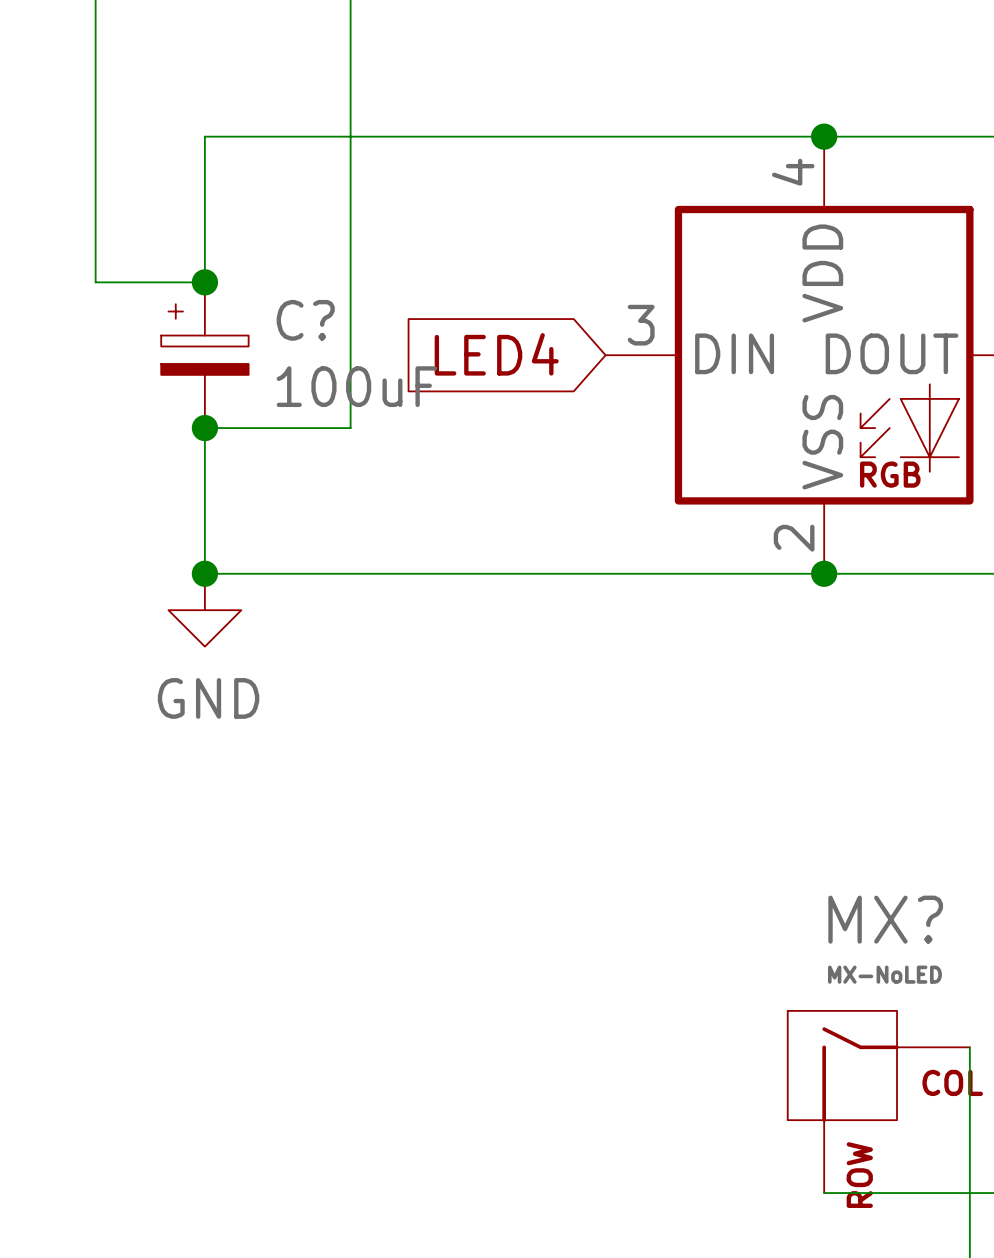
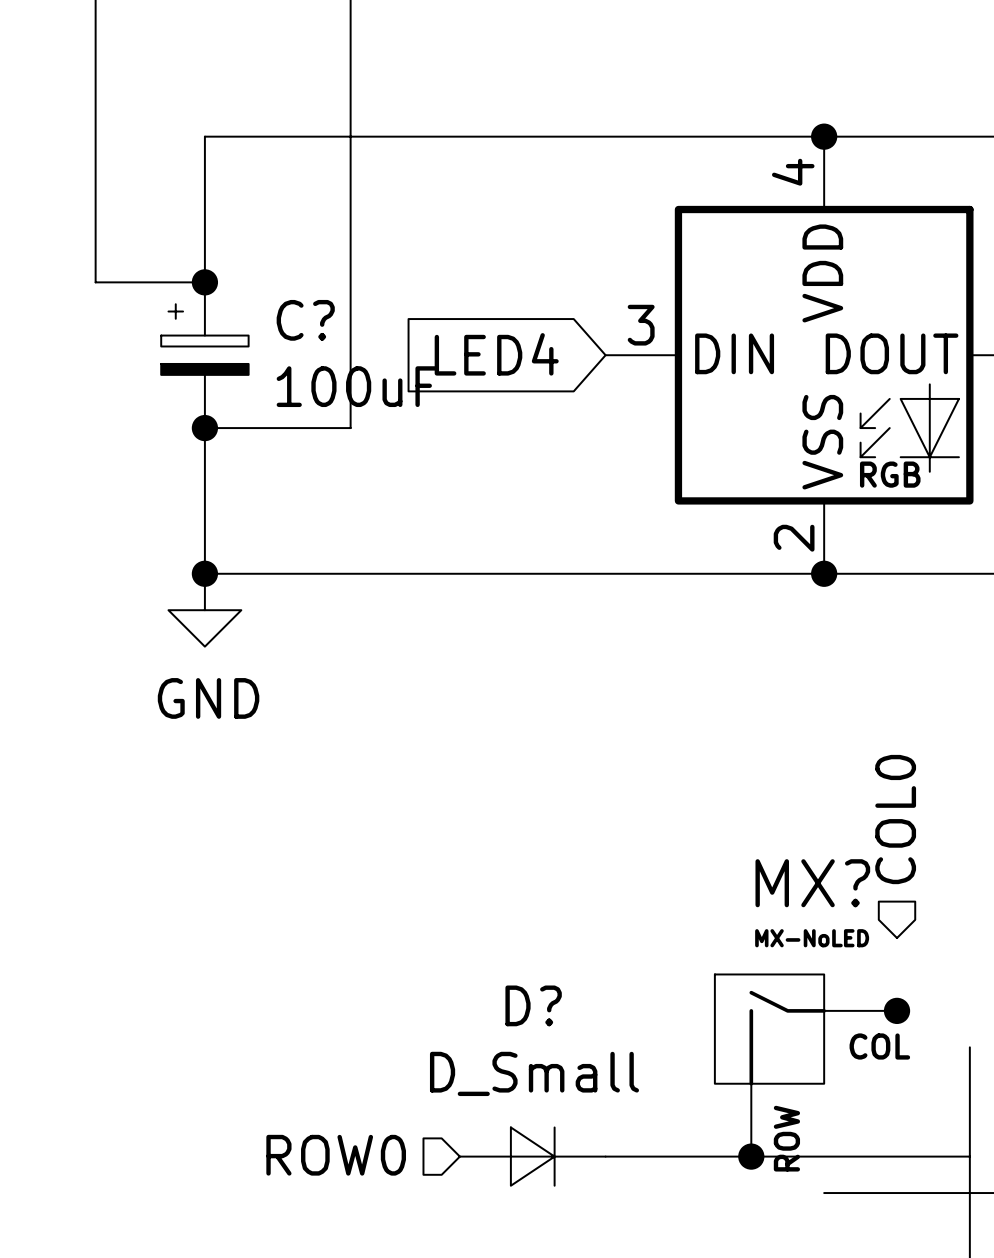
hierarchical label: none -> COL0 (895, 819)
junction: none -> (897, 1010)
MX? position: (878, 1101) -> (805, 1065)
hierarchical label: none -> ROW0 (336, 1155)
D?: none -> D_Small (532, 1156)
wire: none -> (605, 1156) (969, 1156)
junction: none -> (751, 1156)

